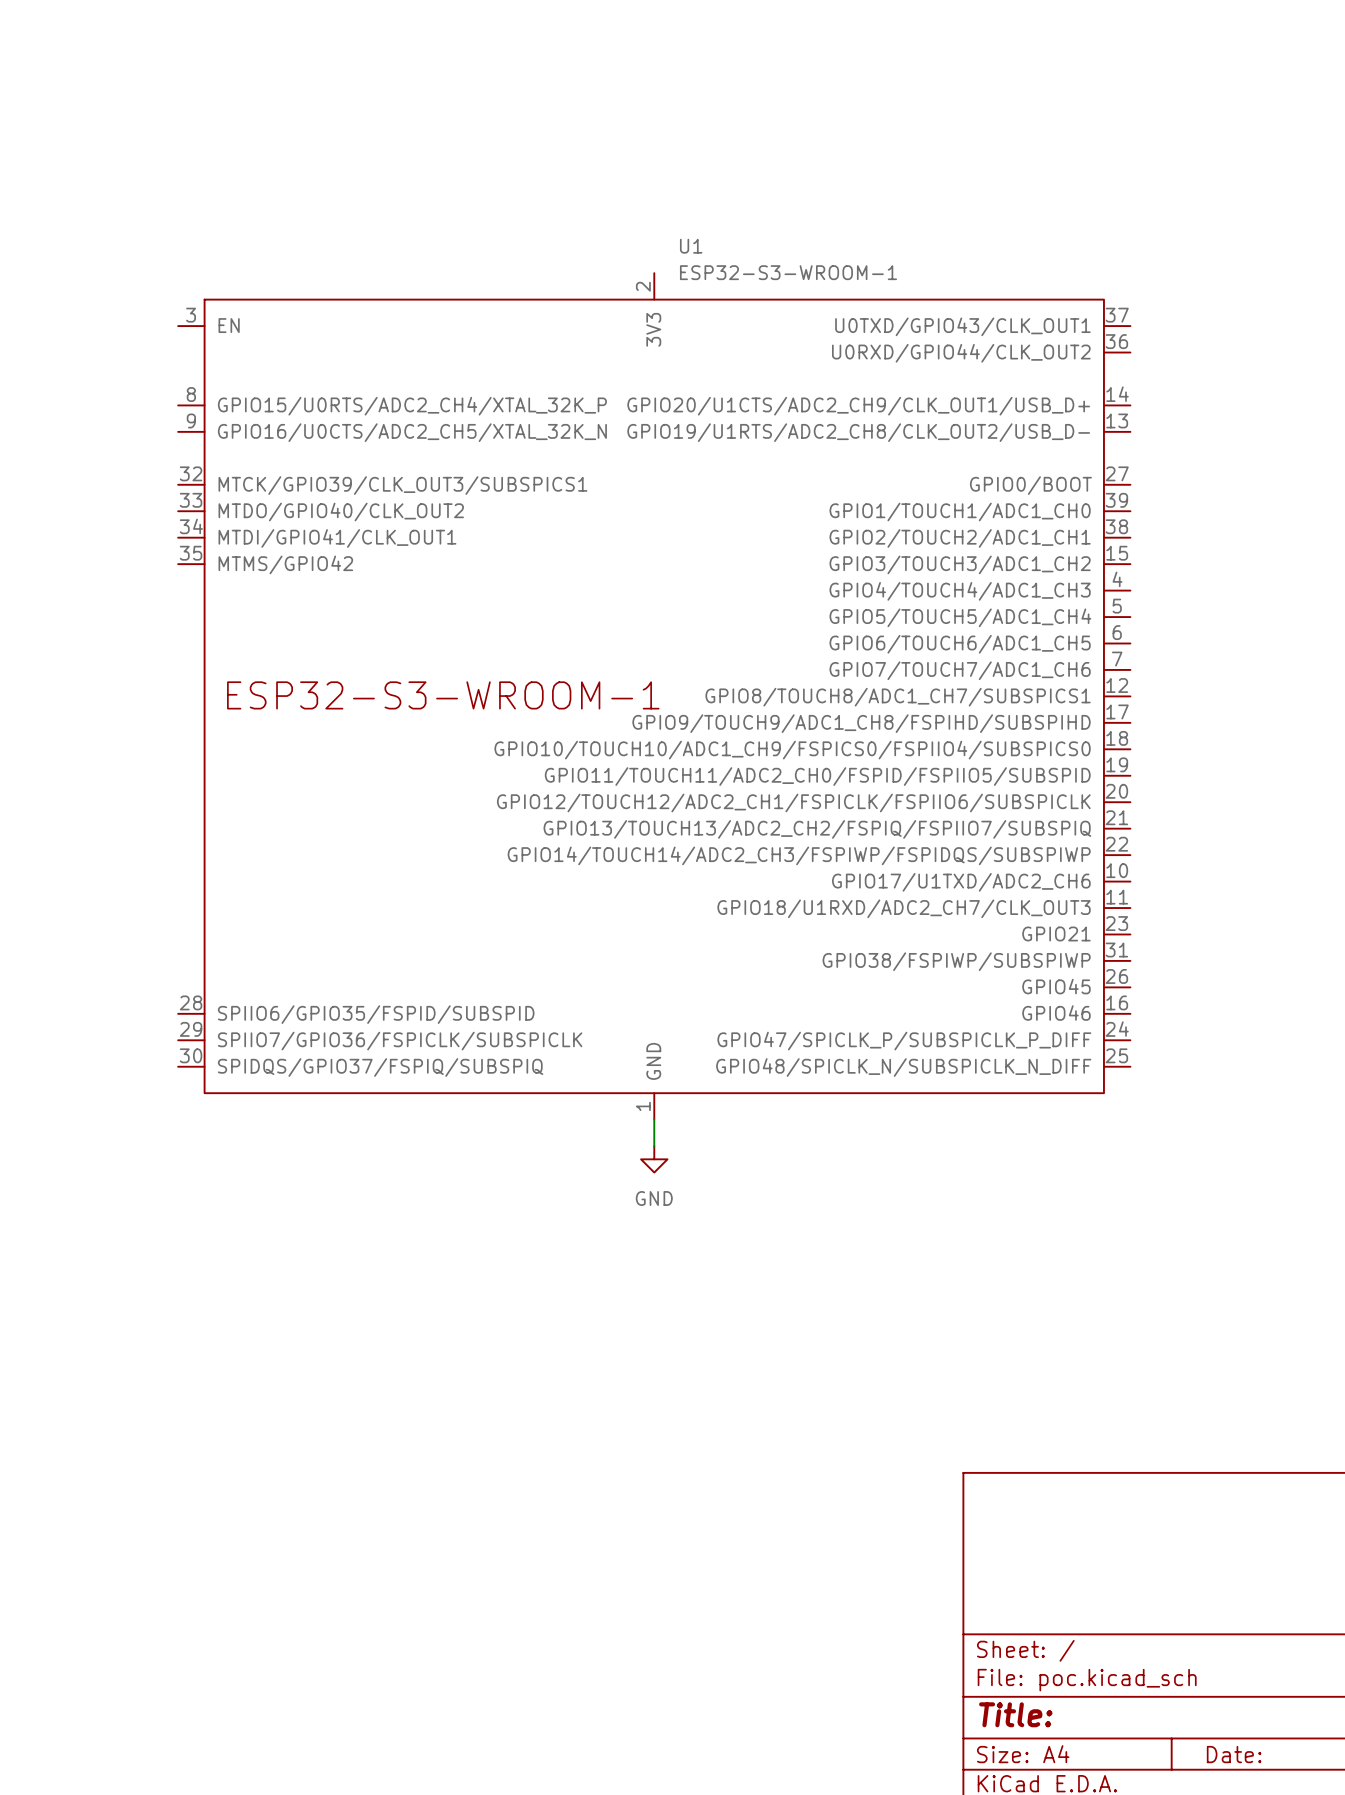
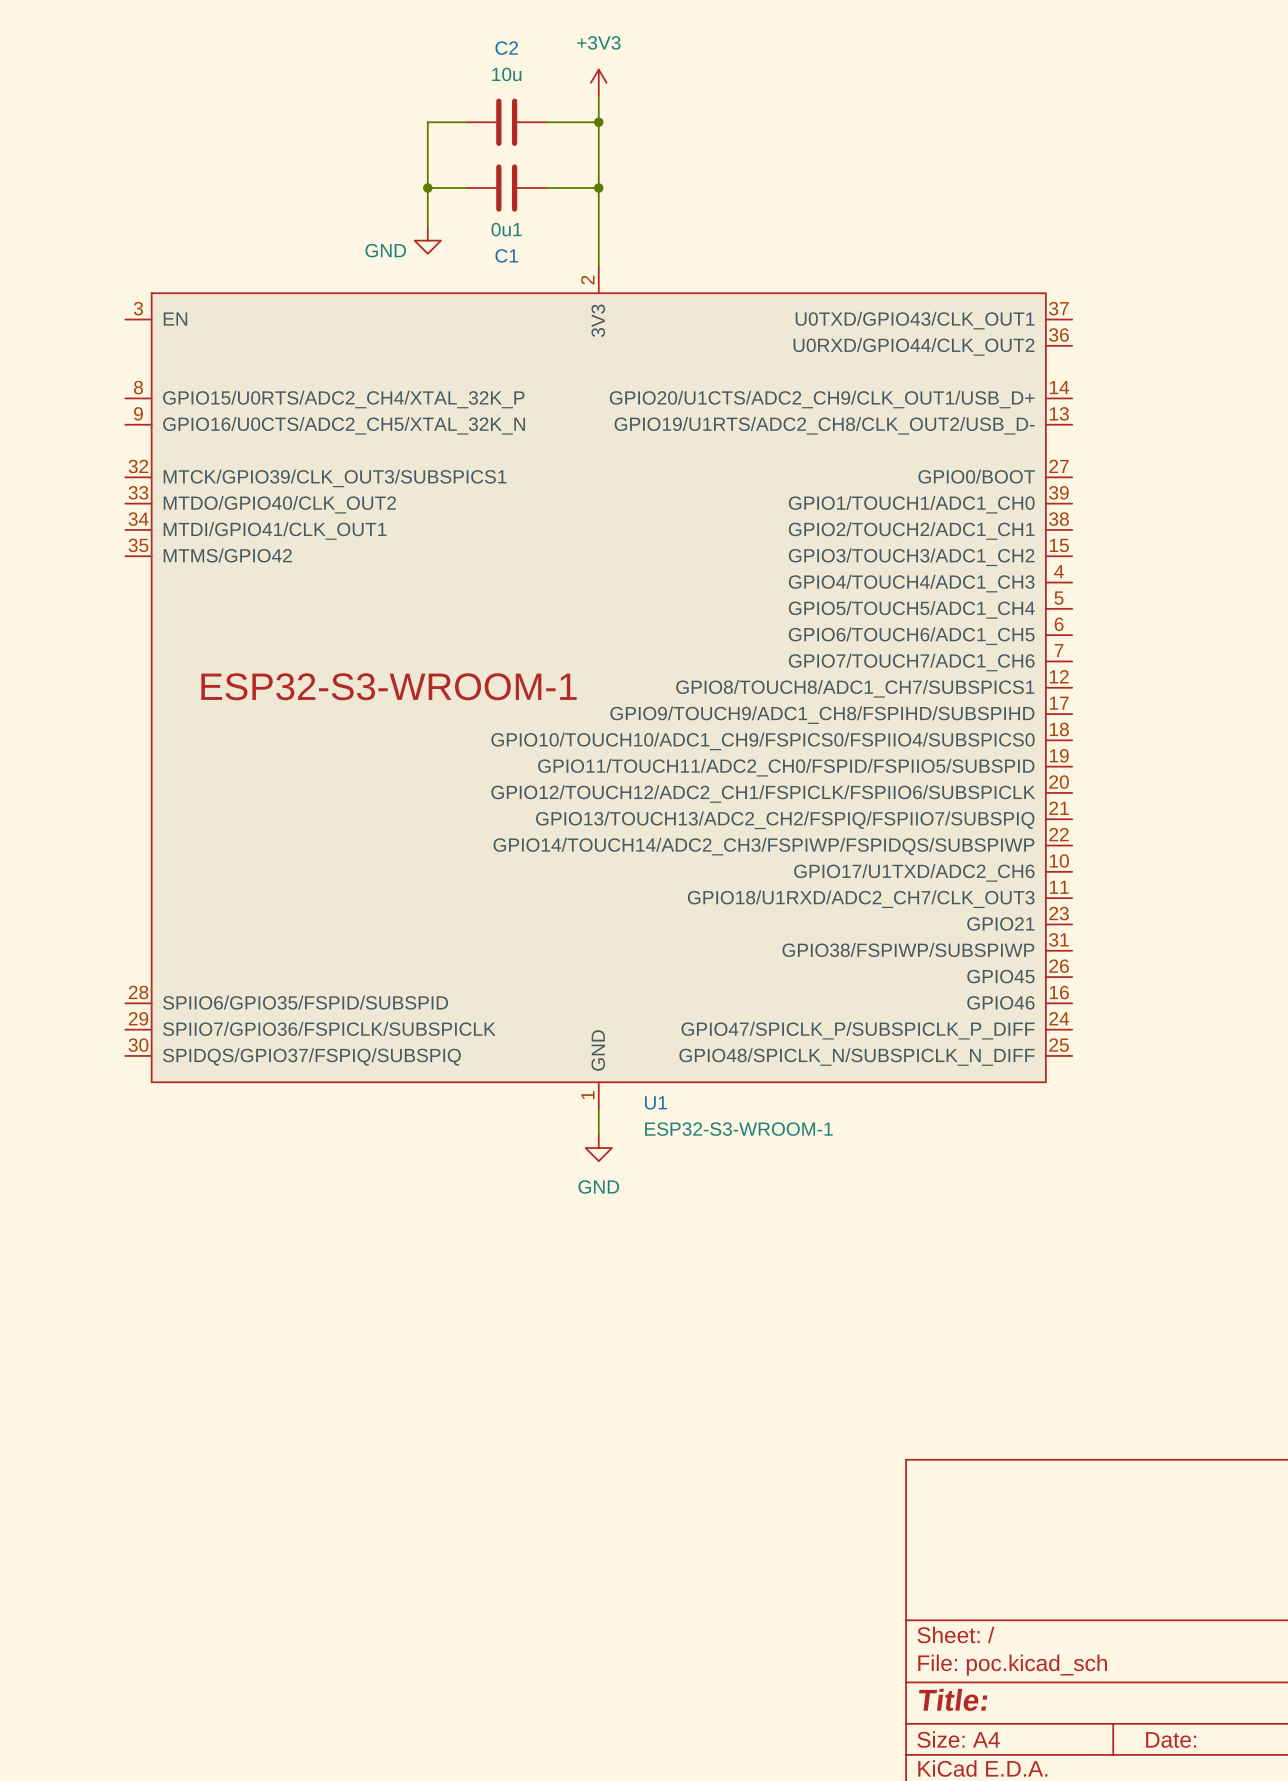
power symbol: none -> +3V3 (598, 82)
wire: none -> (598, 95) (598, 266)
wire: none -> (467, 122) (427, 122) (427, 227)
C2: none -> 10u (506, 122)
wire: none -> (546, 122) (598, 122)
junction: none -> (598, 122)
wire: none -> (427, 188) (467, 188)
junction: none -> (427, 188)
C1: none -> 0u1 (506, 188)
wire: none -> (546, 188) (598, 188)
junction: none -> (598, 188)
power symbol: none -> GND (427, 240)
U1 name position: U1 (691, 246) -> U1 (655, 1102)
U1 value position: ESP32-S3-WROOM-1 (788, 272) -> ESP32-S3-WROOM-1 (738, 1129)

